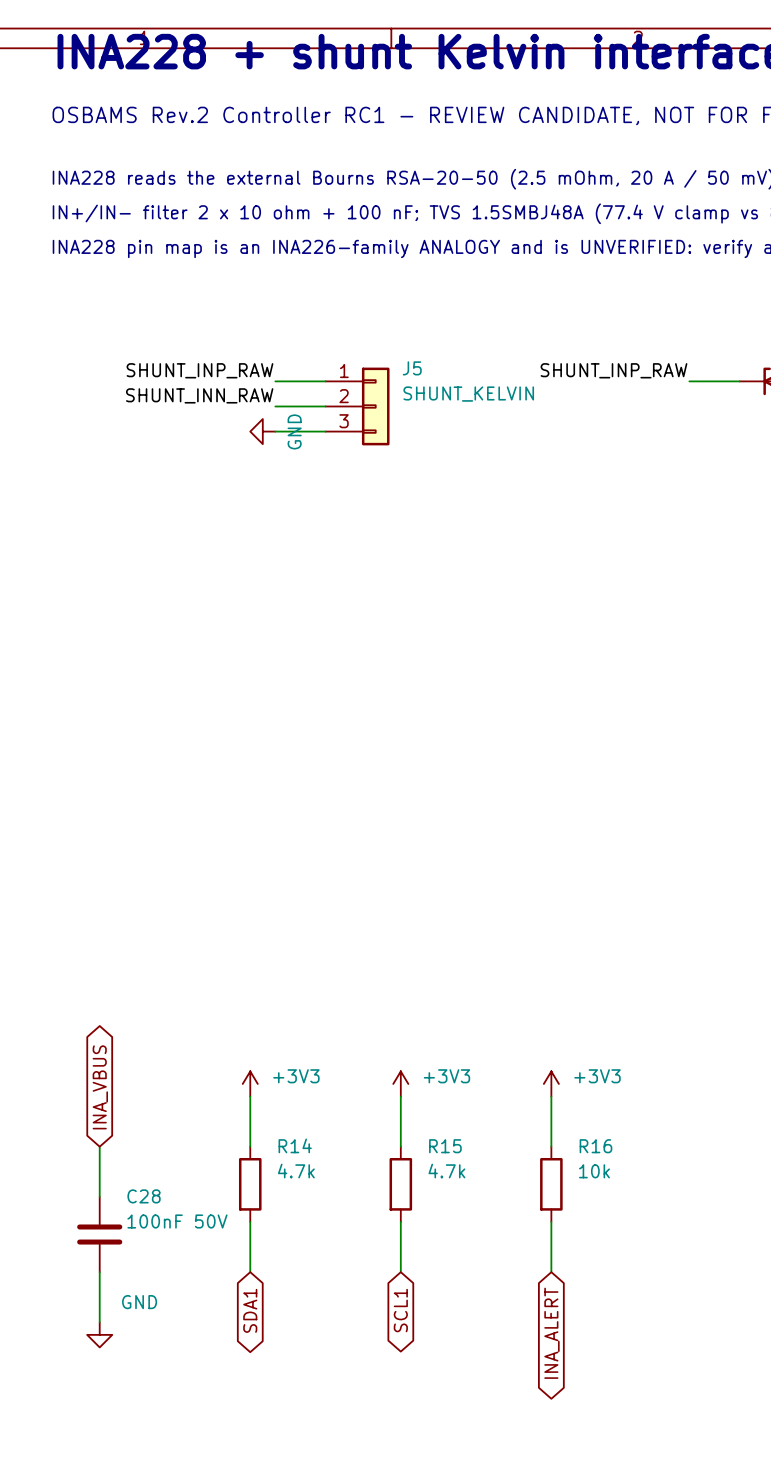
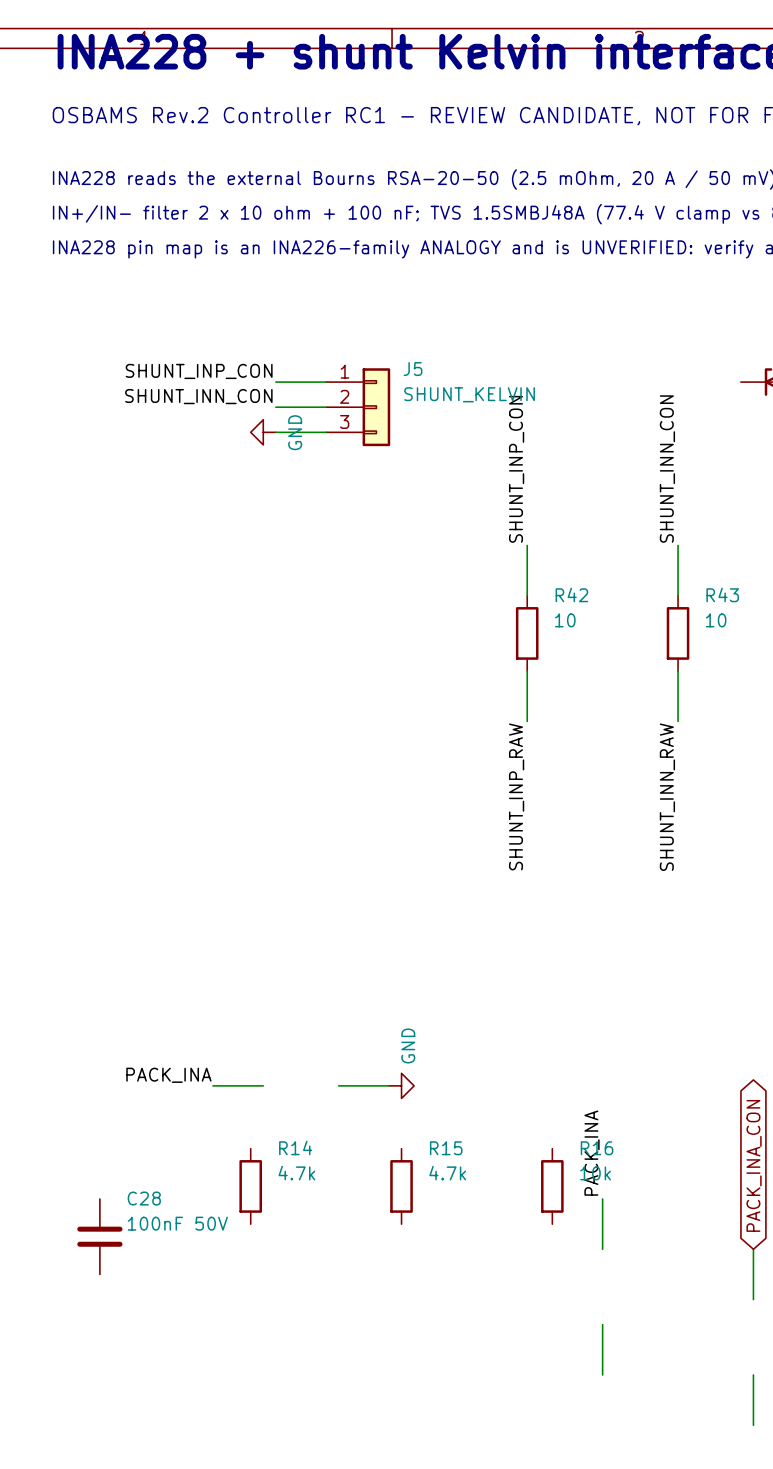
label: SHUNT_INP_RAW (199, 370) -> SHUNT_INP_CON (199, 371)
label: SHUNT_INP_RAW (614, 370) -> none
wire: (689, 381) (739, 381) -> none
label: SHUNT_INN_RAW (199, 395) -> SHUNT_INN_CON (198, 396)
label: none -> SHUNT_INP_CON (516, 469)
label: none -> SHUNT_INN_CON (667, 469)
wire: none -> (527, 545) (527, 595)
wire: none -> (678, 545) (678, 595)
R42: none -> 10 (527, 633)
R43: none -> 10 (678, 633)
wire: none -> (527, 671) (527, 721)
wire: none -> (678, 671) (678, 721)
label: none -> SHUNT_INP_RAW (516, 796)
label: none -> SHUNT_INN_RAW (667, 797)
label: none -> PACK_INA (168, 1075)
wire: none -> (213, 1085) (263, 1085)
power symbol: +3V3 (250, 1083) -> none
wire: none -> (338, 1085) (388, 1085)
power symbol: +3V3 (400, 1083) -> GND (401, 1085)
power symbol: +3V3 (551, 1083) -> none
global label: INA_VBUS (100, 1087) -> none
wire: (250, 1096) (250, 1146) -> none
wire: (400, 1096) (400, 1146) -> none
wire: (551, 1096) (551, 1146) -> (602, 1199) (602, 1249)
wire: (99, 1146) (99, 1196) -> none
label: none -> PACK_INA (592, 1153)
global label: none -> PACK_INA_CON (754, 1165)
wire: (250, 1221) (250, 1272) -> none
wire: (400, 1221) (400, 1272) -> none
wire: (551, 1221) (551, 1272) -> (602, 1324) (602, 1374)
wire: none -> (753, 1249) (753, 1299)
wire: (99, 1272) (99, 1322) -> none
global label: SDA1 (250, 1310) -> none
global label: SCL1 (400, 1310) -> none
global label: INA_ALERT (551, 1333) -> none
power symbol: GND (99, 1334) -> none
wire: none -> (753, 1374) (753, 1425)

